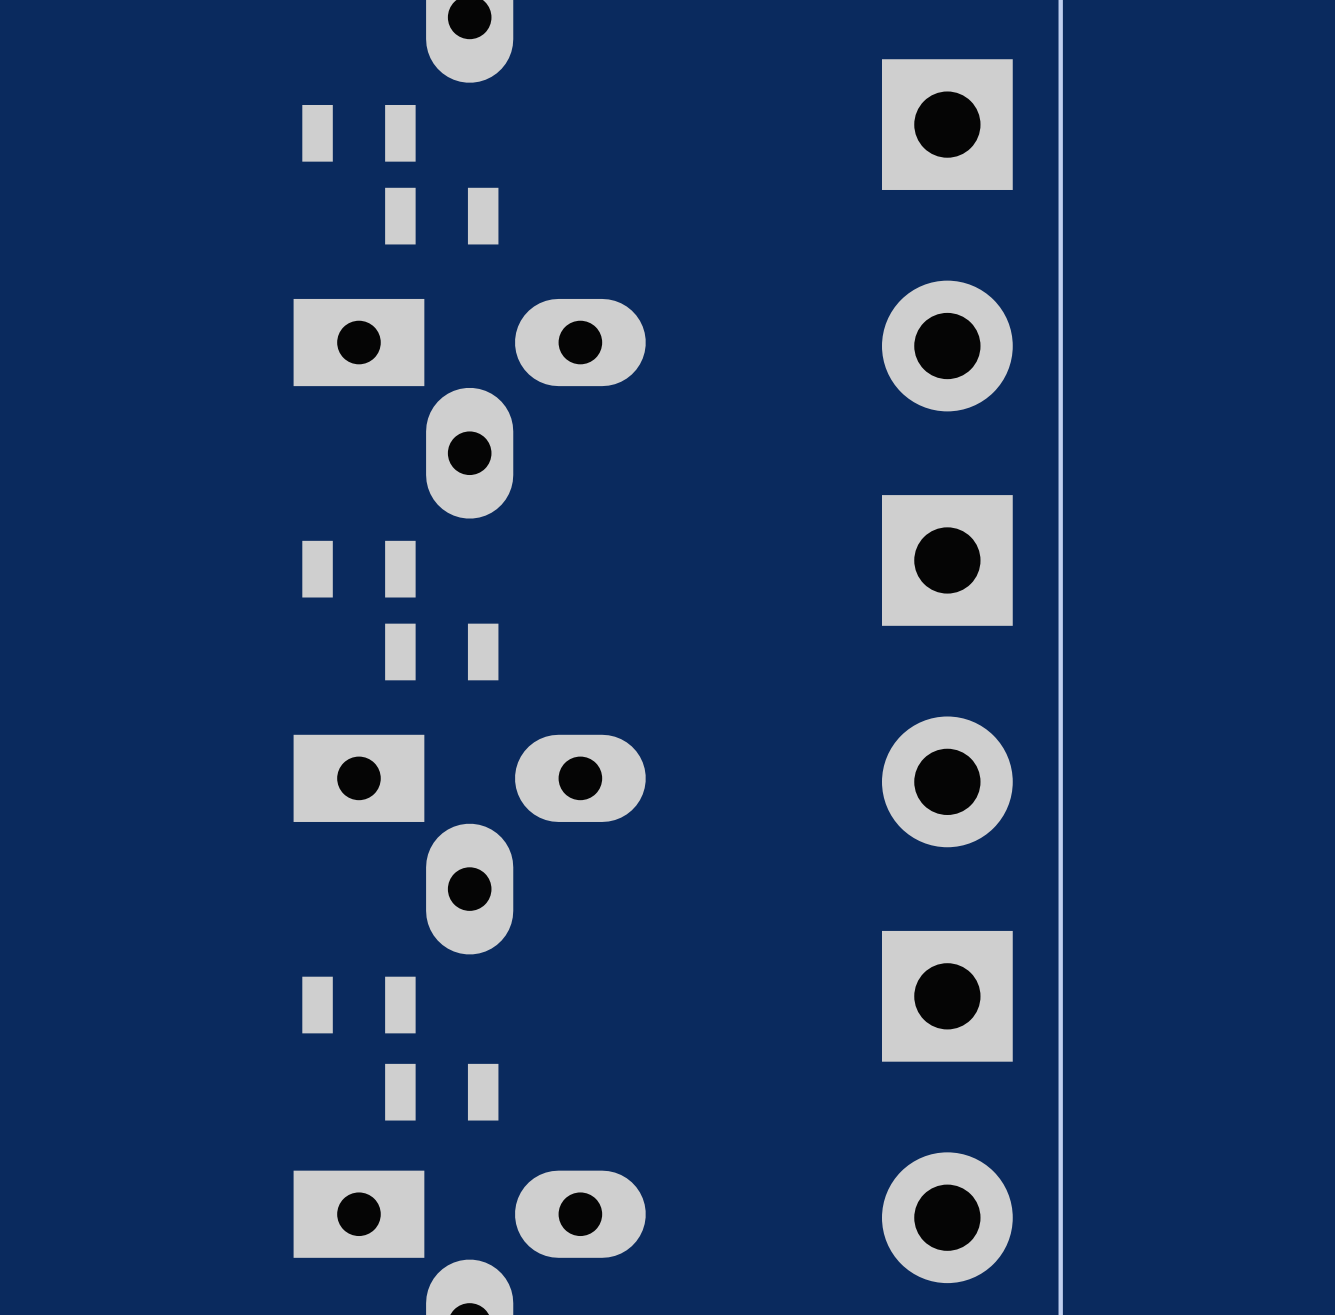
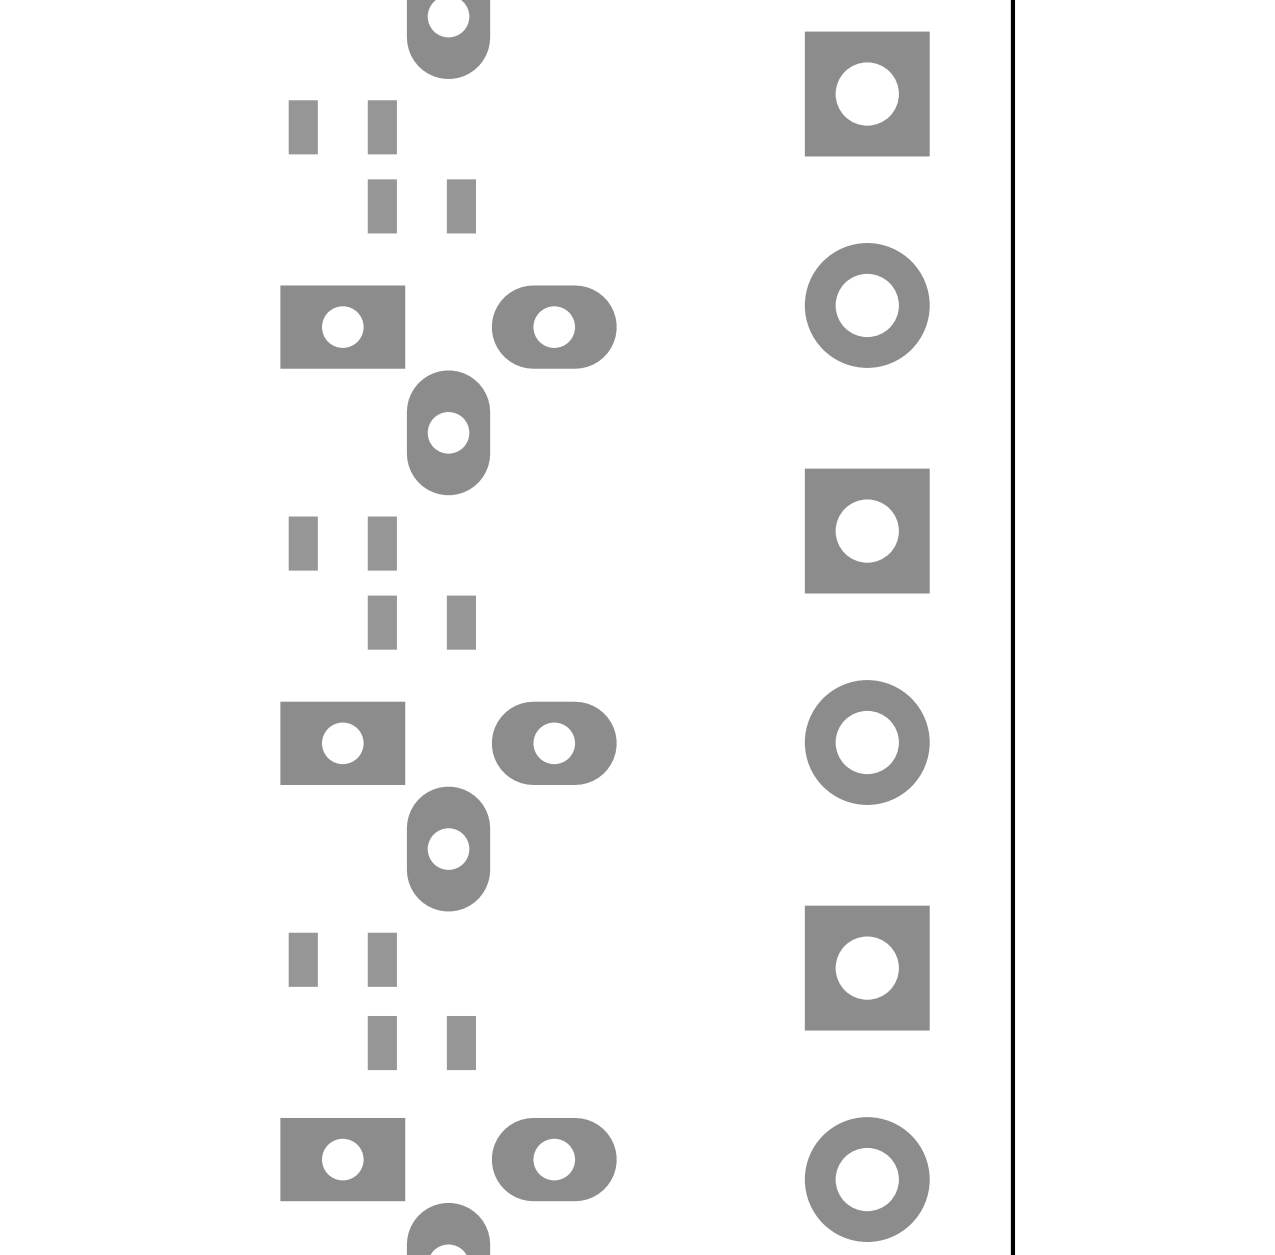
part position: (947, 235) -> (867, 199)
part position: (947, 671) -> (867, 636)
part position: (947, 1107) -> (867, 1073)

